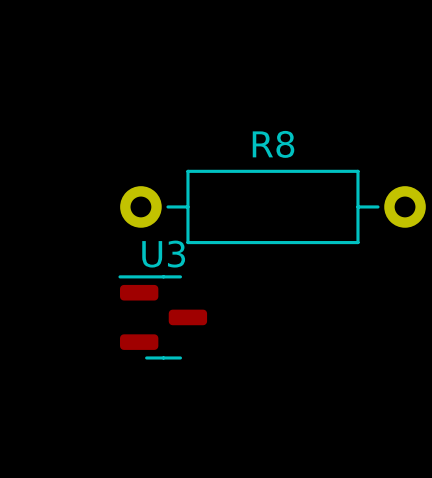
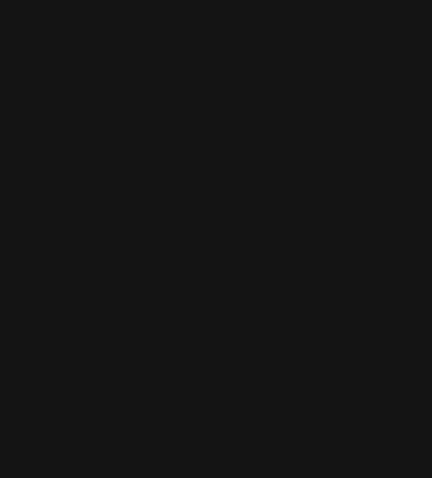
R8: (272, 206) -> none
U3: (162, 317) -> none

